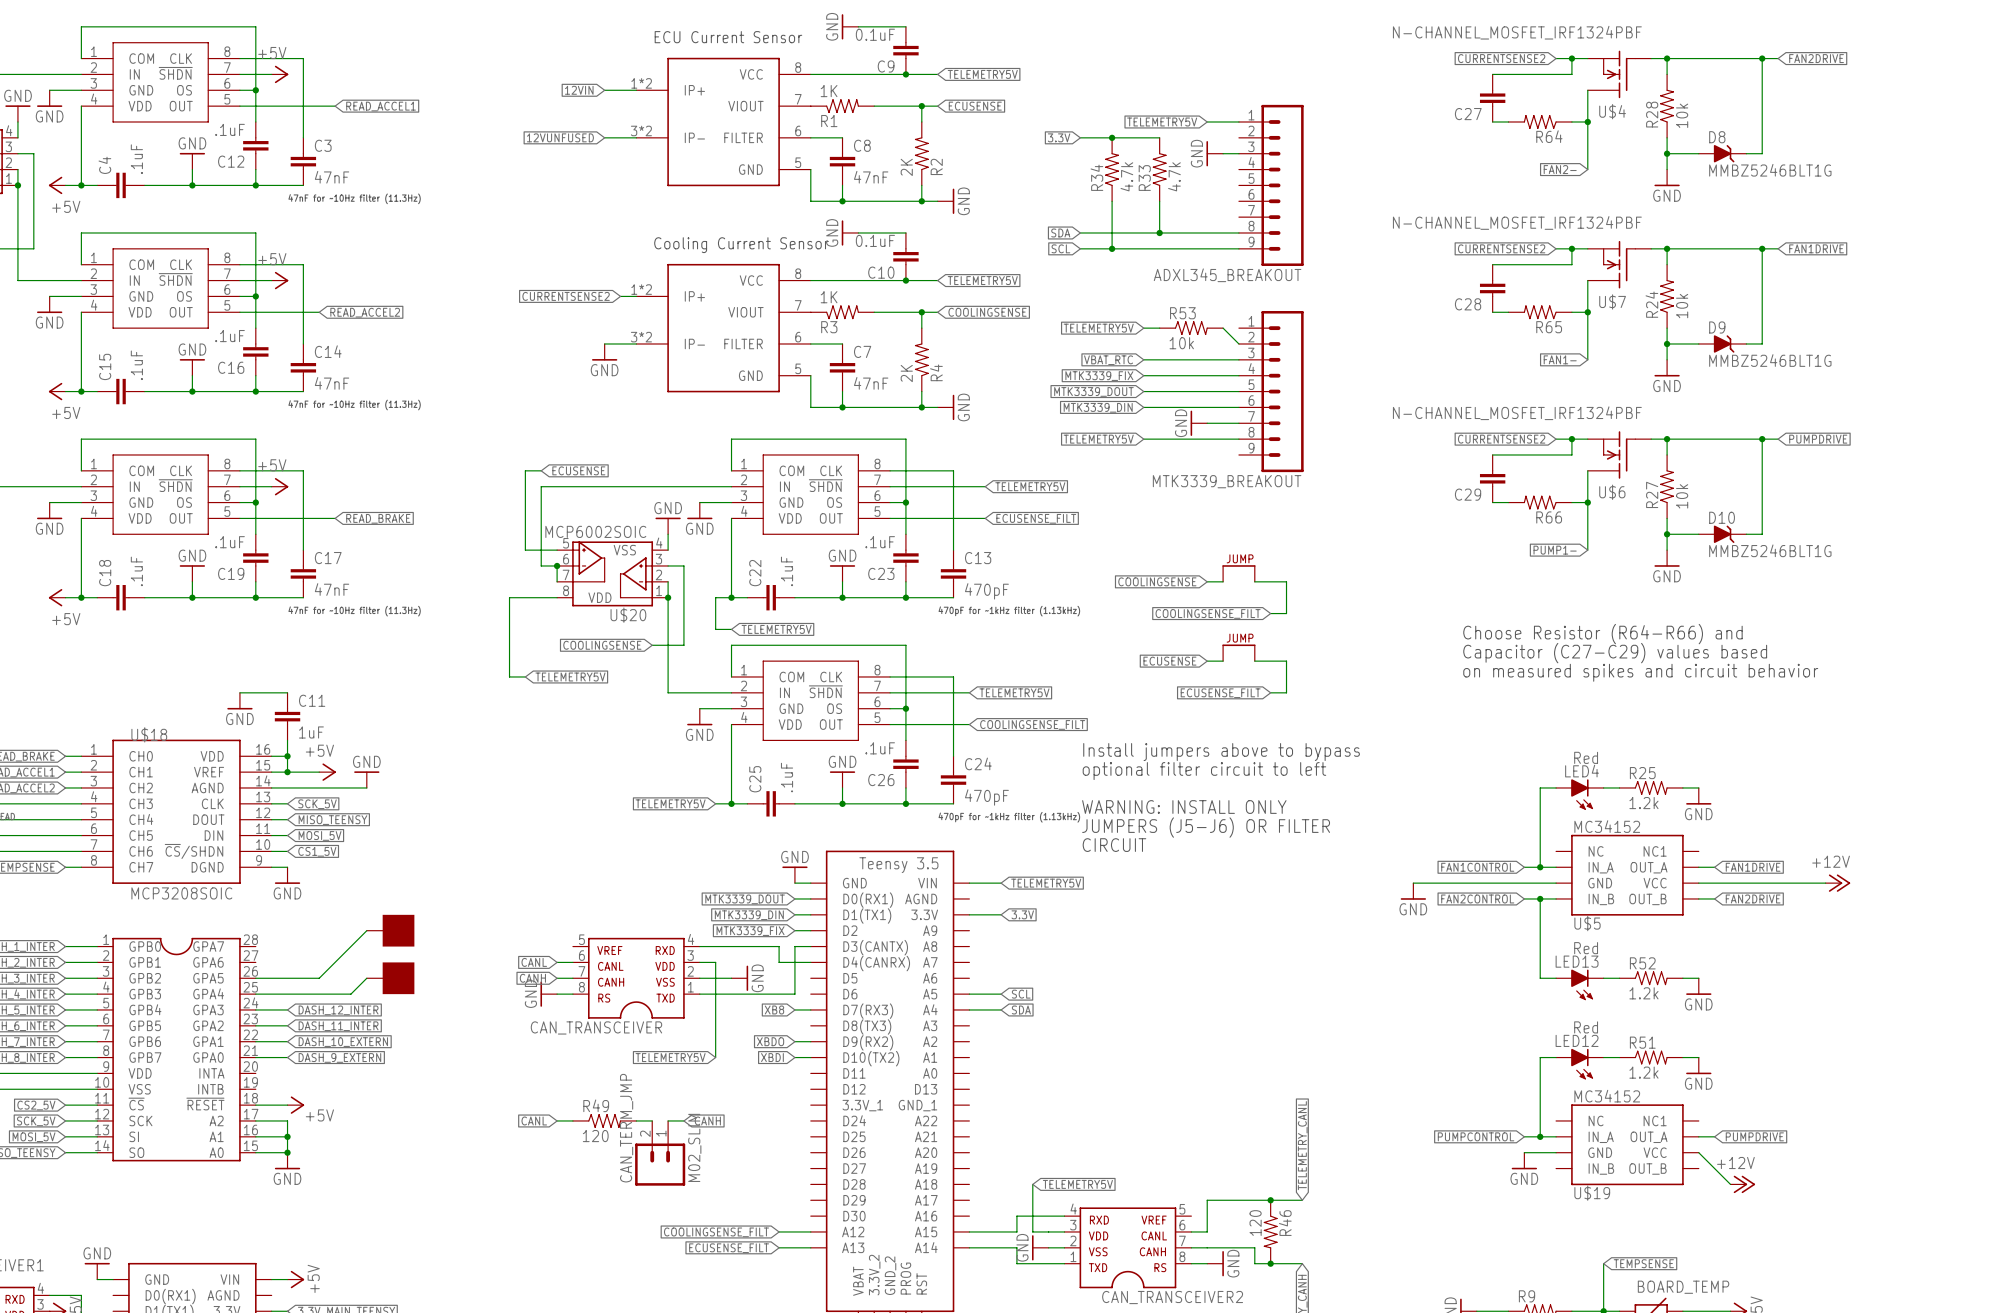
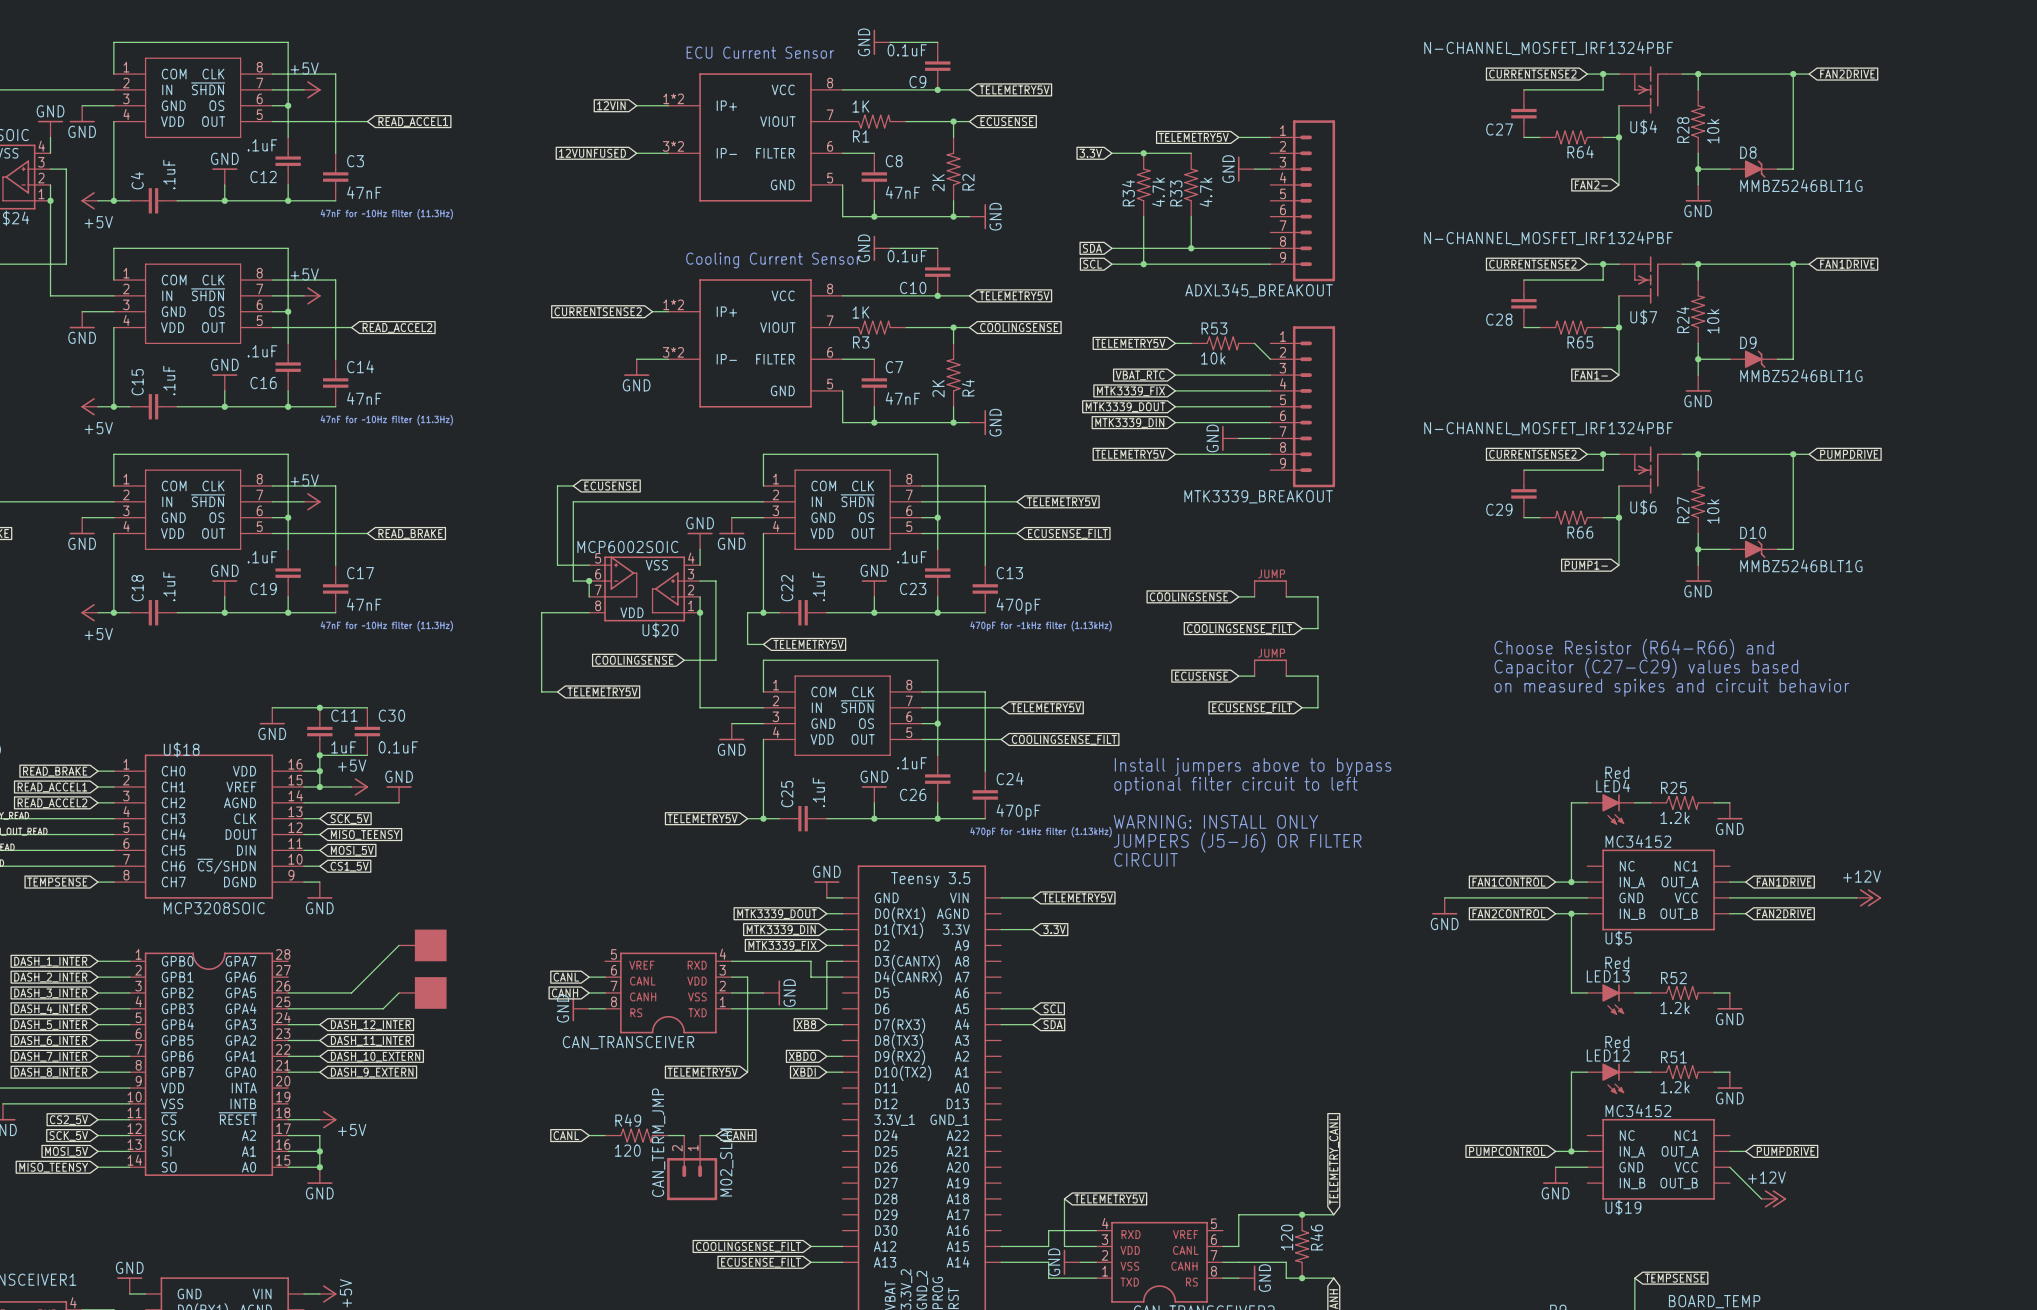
wire: none -> (319, 707) (367, 707)
junction: none -> (319, 707)
C30: none -> 0.1uF (367, 731)
wire: none -> (319, 755) (367, 755)
junction: none -> (319, 755)

